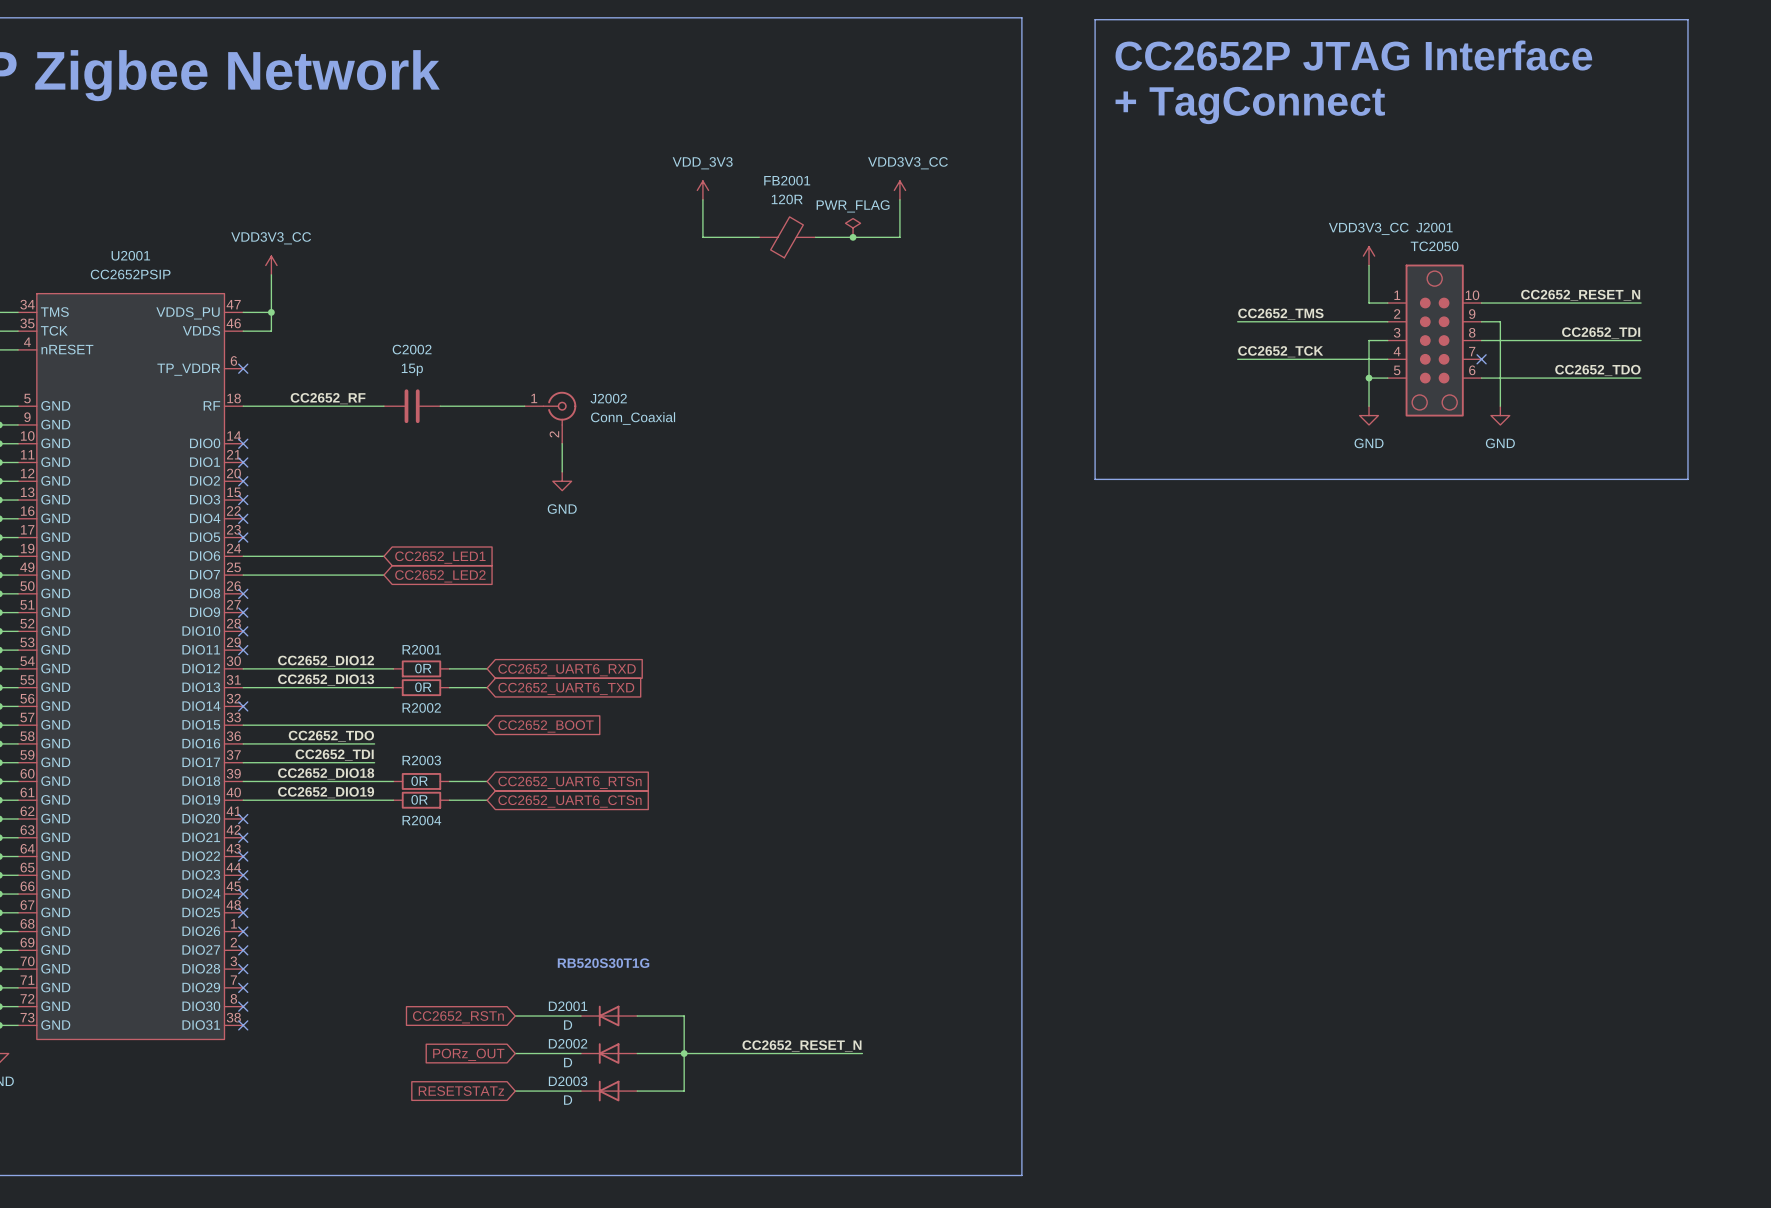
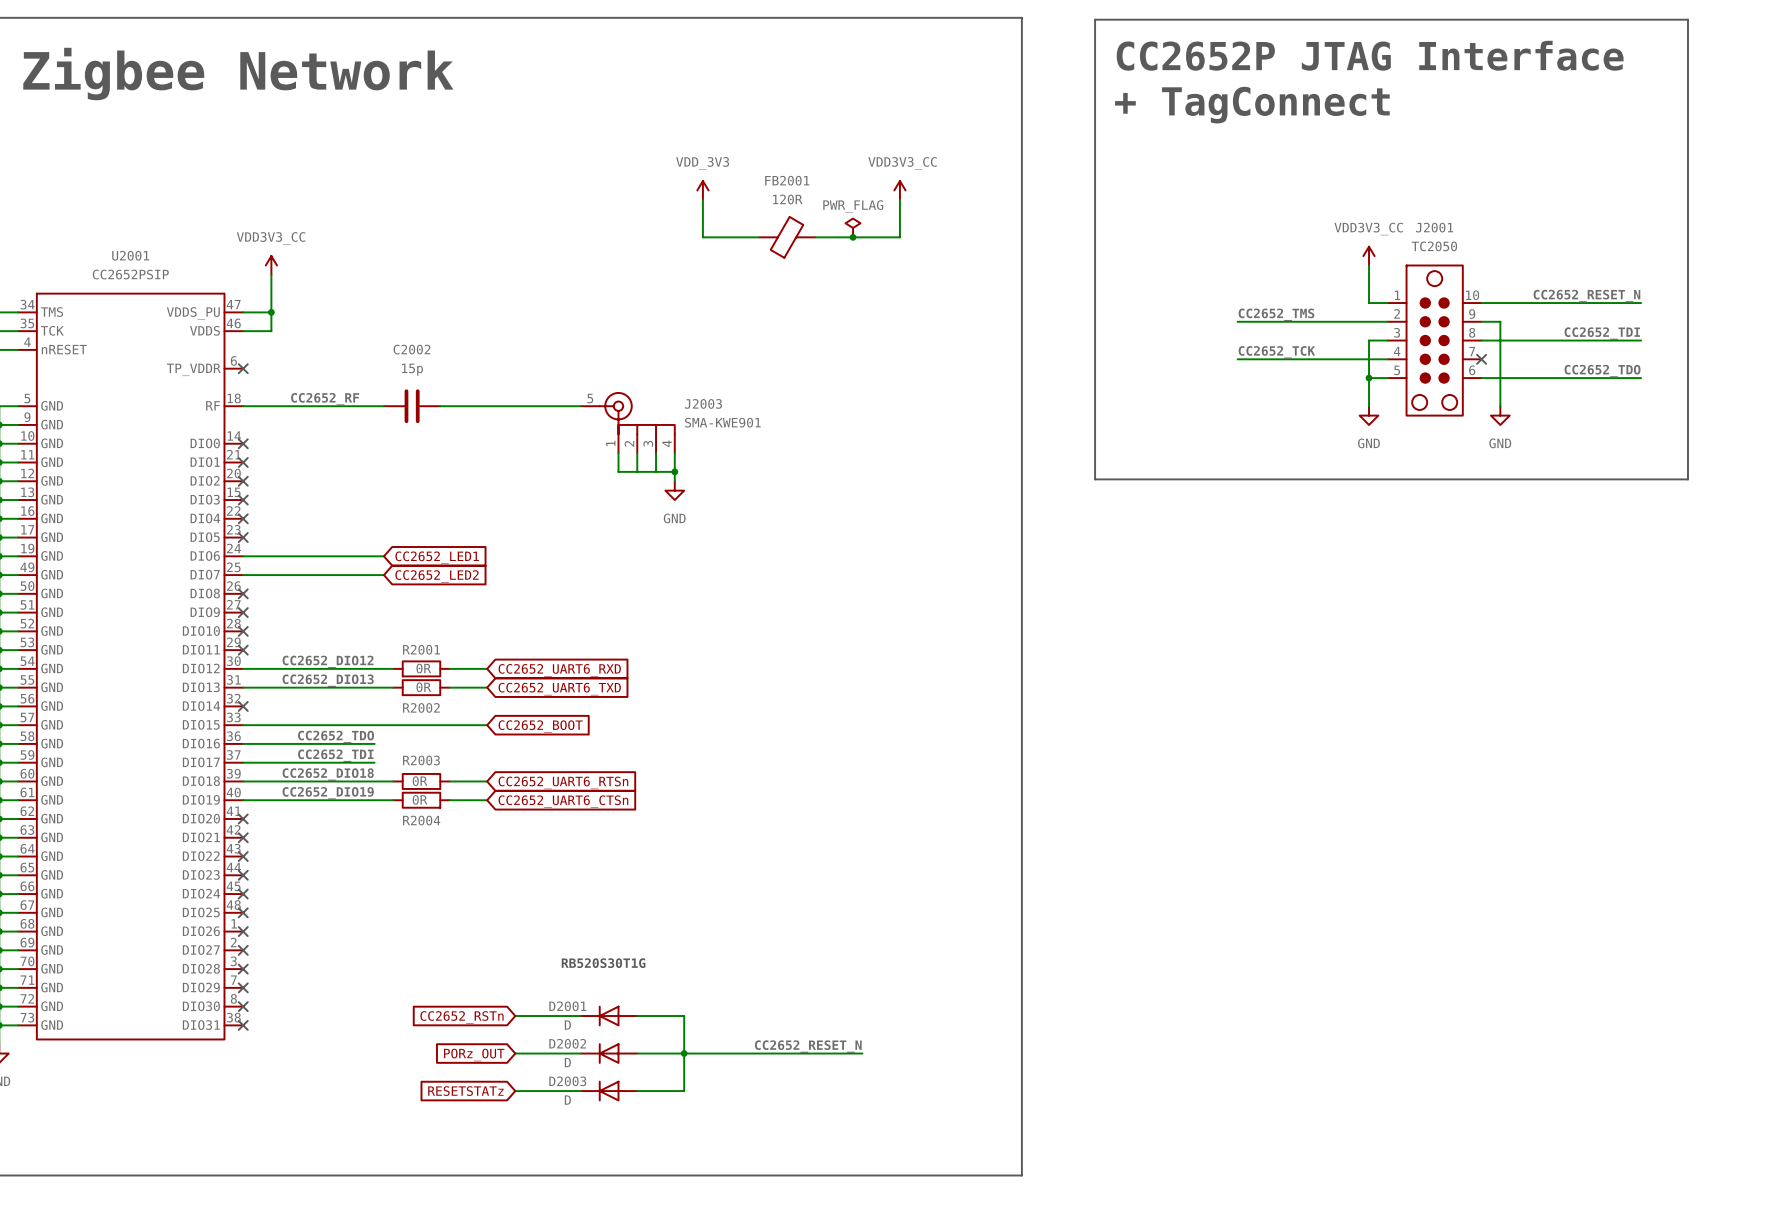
J2002: Conn_Coaxial (550, 417) -> none
J2003: none -> SMA-KWE901 (627, 423)
wire: (562, 443) (562, 471) -> (674, 453) (674, 481)
wire: none -> (618, 453) (618, 471) (674, 471)
wire: none -> (637, 453) (637, 471)
wire: none -> (656, 453) (656, 471)
junction: none -> (674, 471)
power symbol position: GND (562, 481) -> GND (674, 490)

